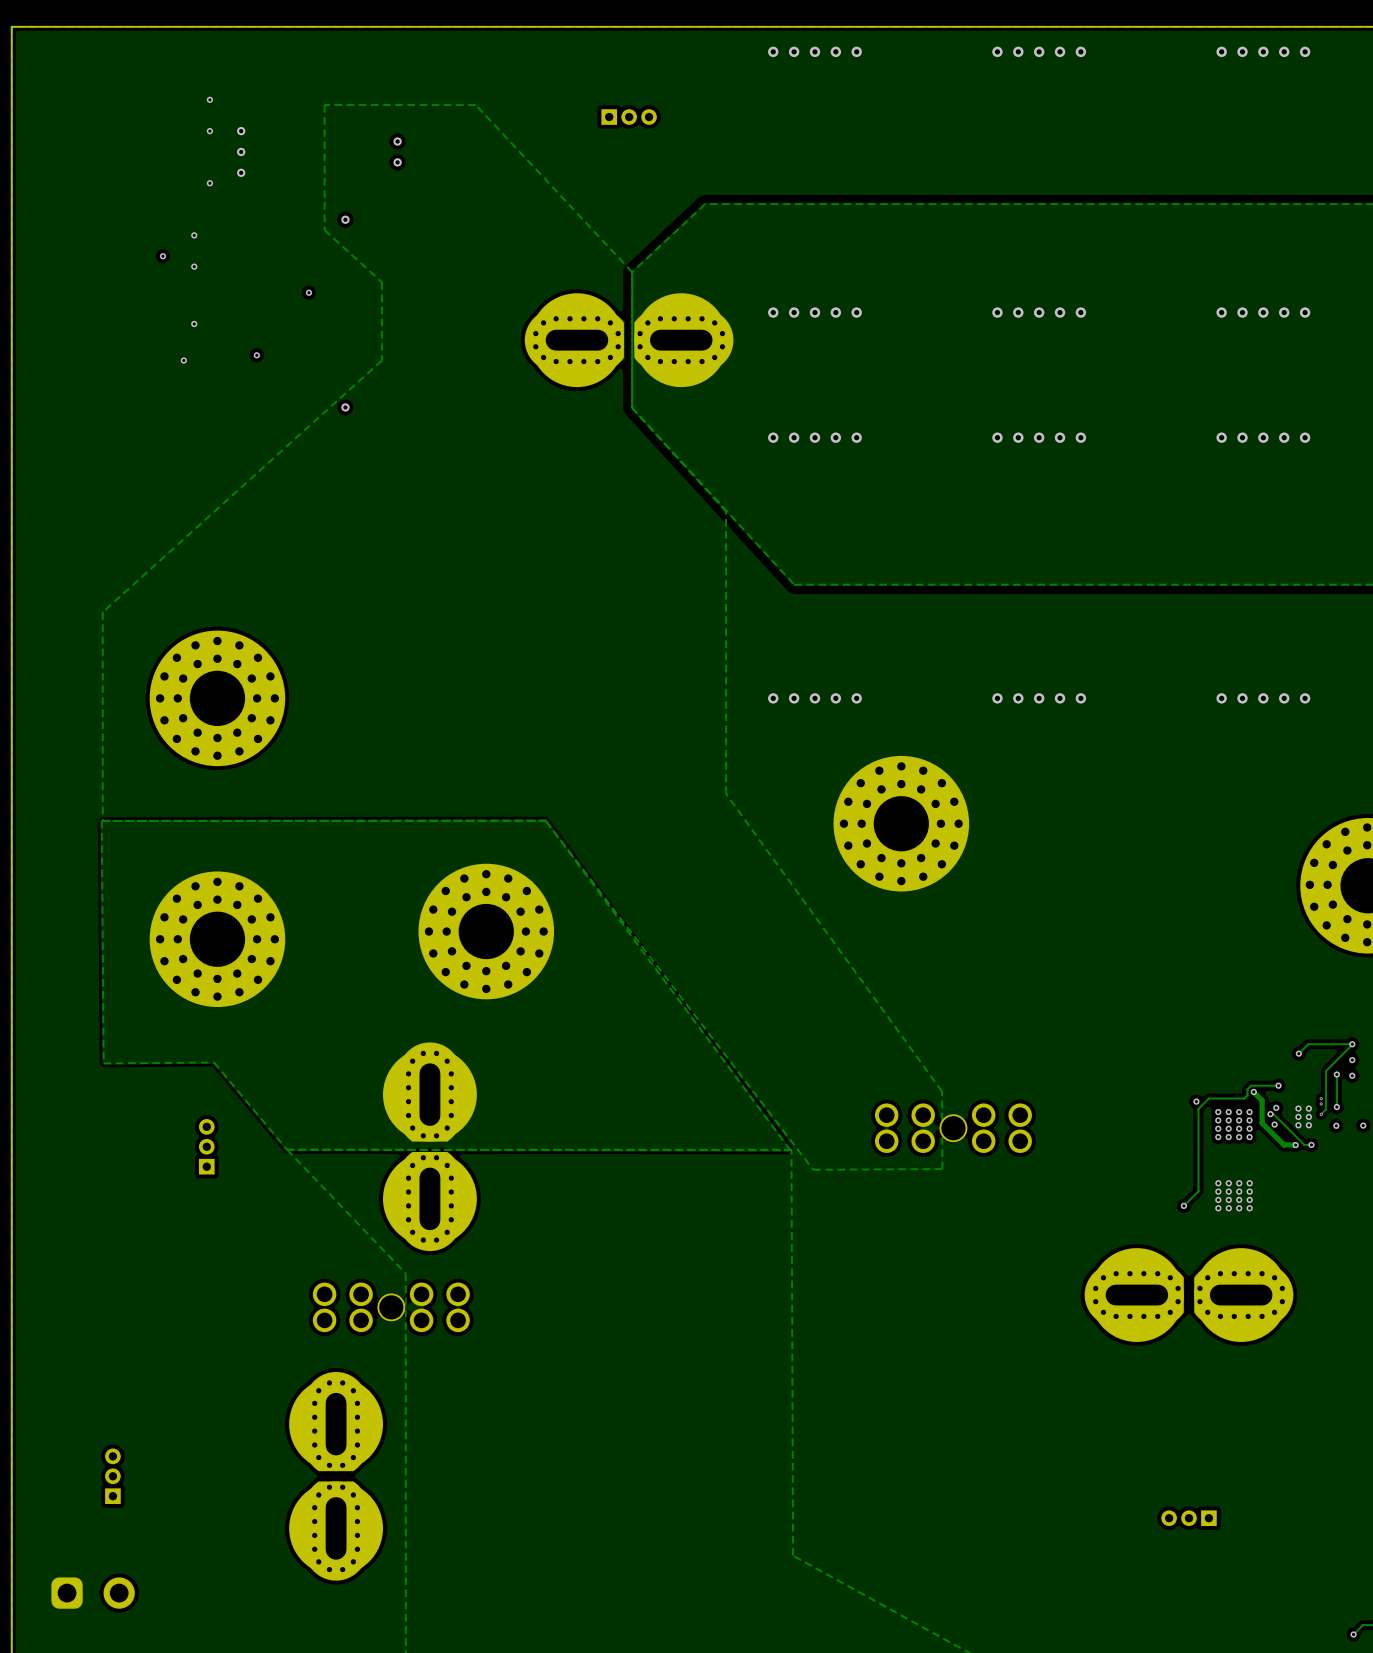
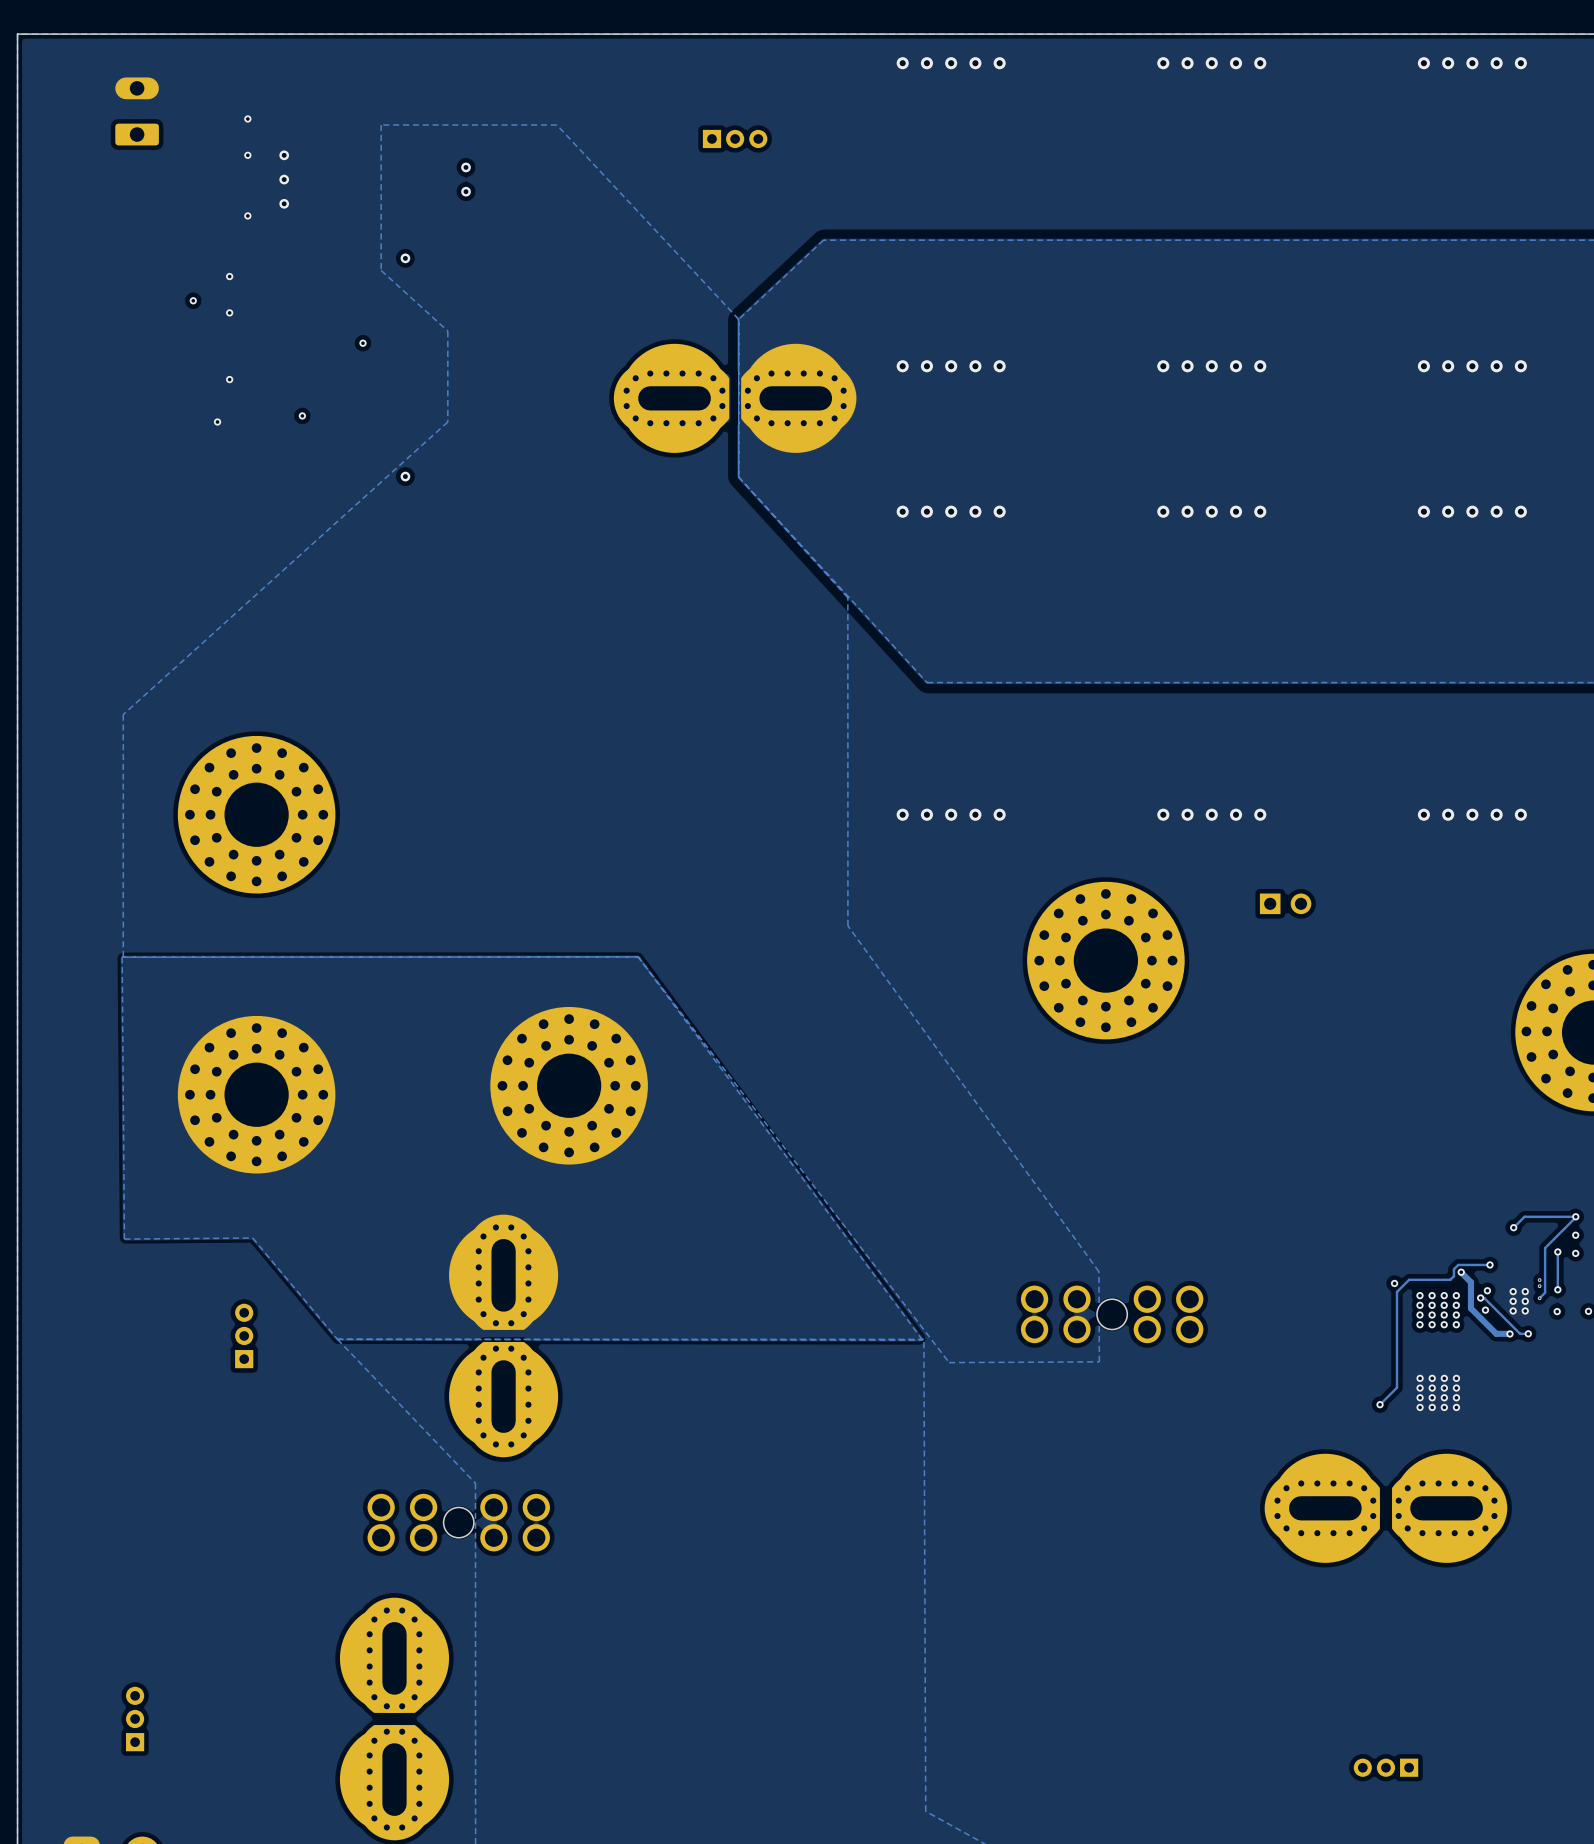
part: none -> (137, 111)
part: none -> (1285, 903)
part position: (901, 823) -> (1105, 960)

